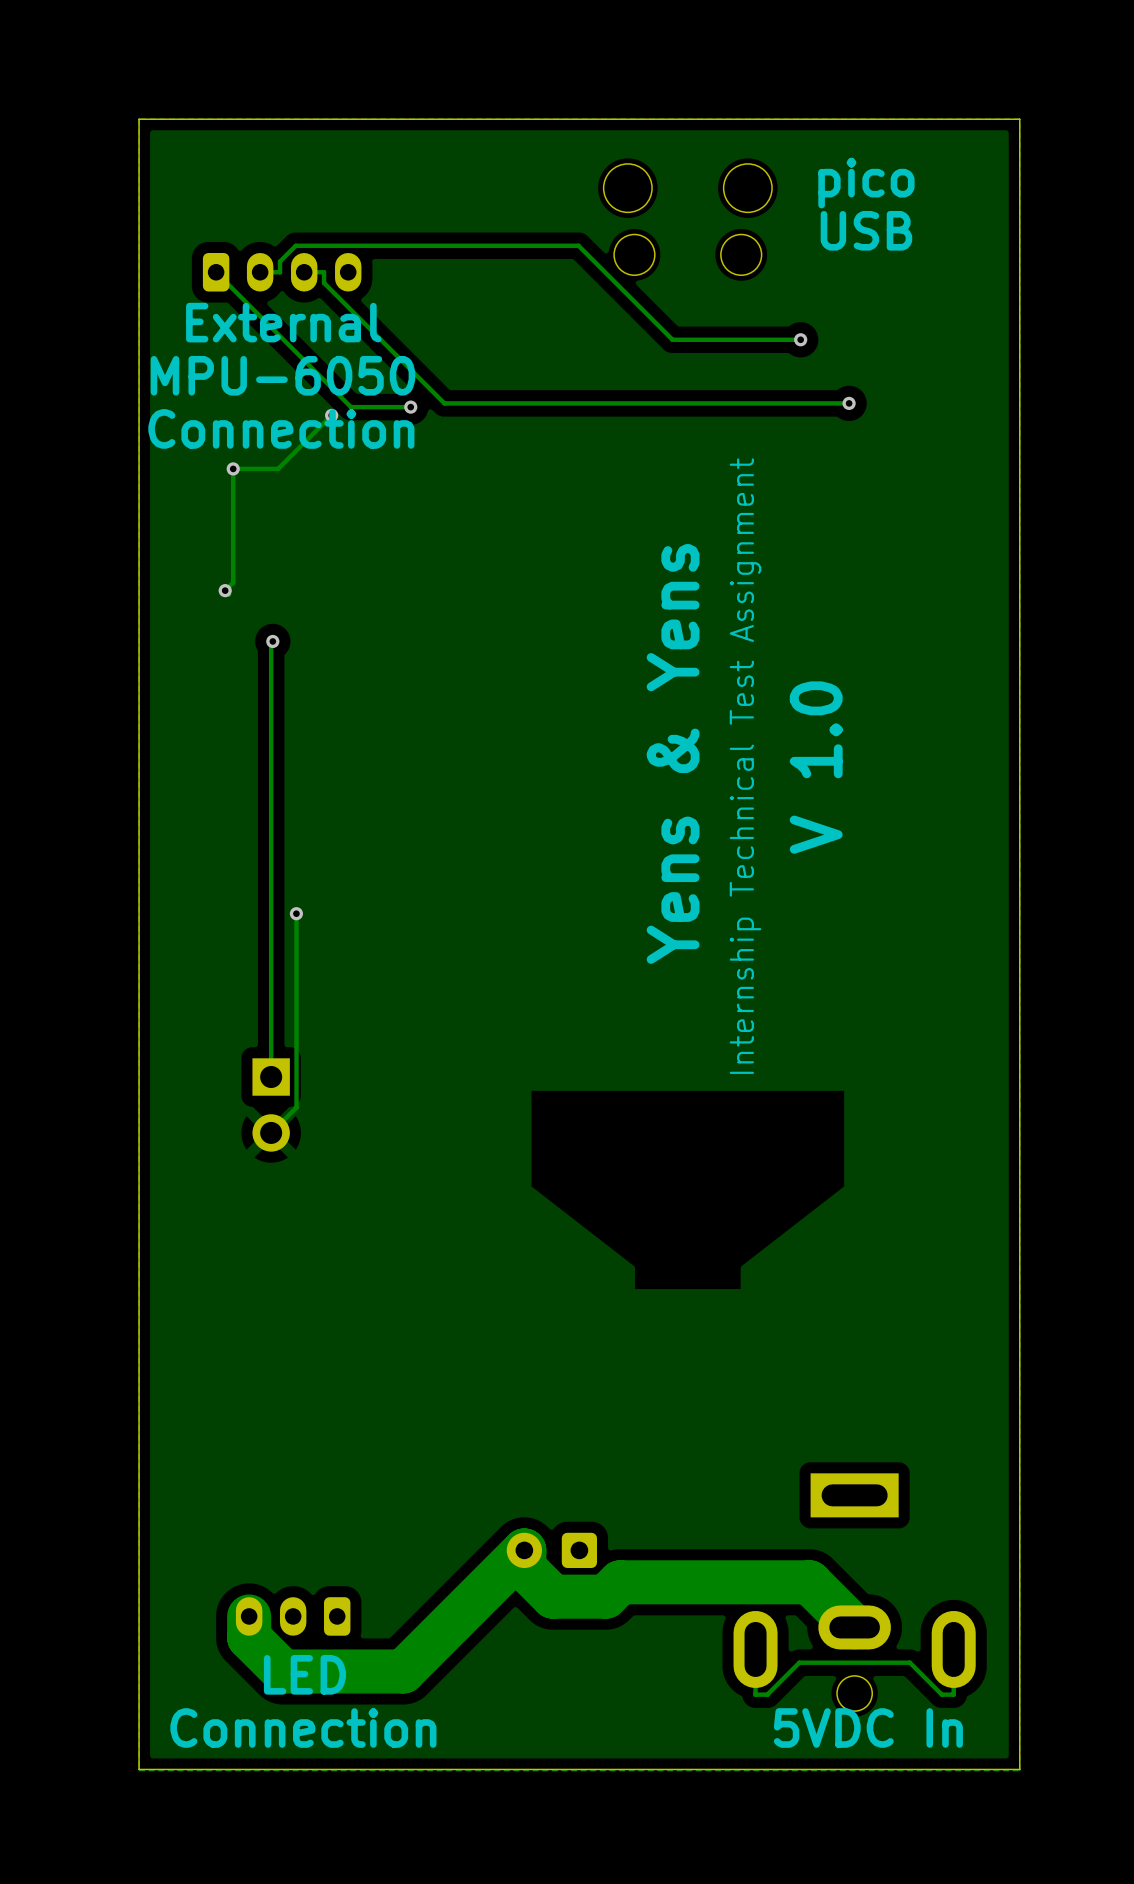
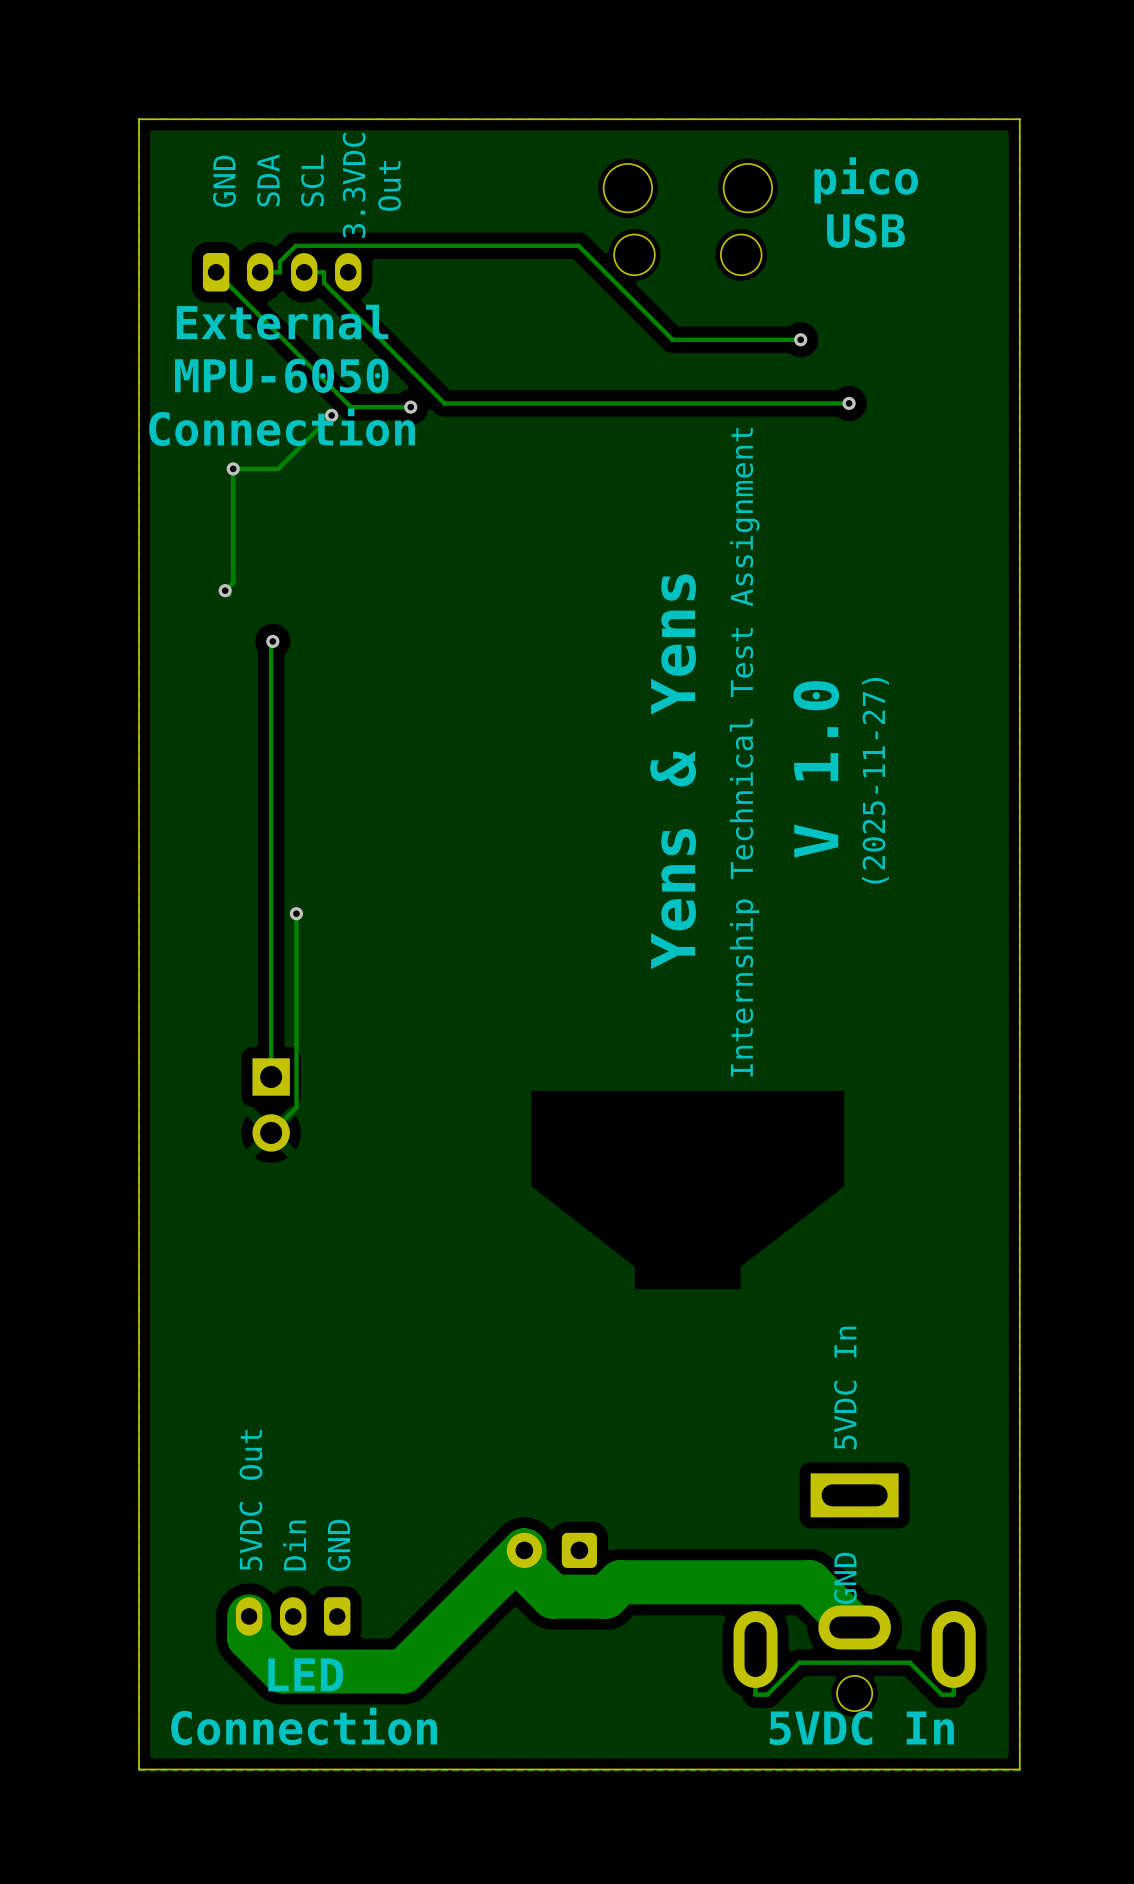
text: none -> GND (224, 181)
text: none -> SDA (268, 180)
text: none -> SCL (312, 180)
text: none -> Out (389, 185)
text: none -> 3.3VDC (354, 185)
text: none -> (2025-11-27) (875, 780)
text: none -> 5VDC In (845, 1387)
text: none -> 5VDC Out (250, 1500)
text: none -> GND (339, 1545)
text: none -> Din (294, 1545)
text: none -> GND (845, 1578)

